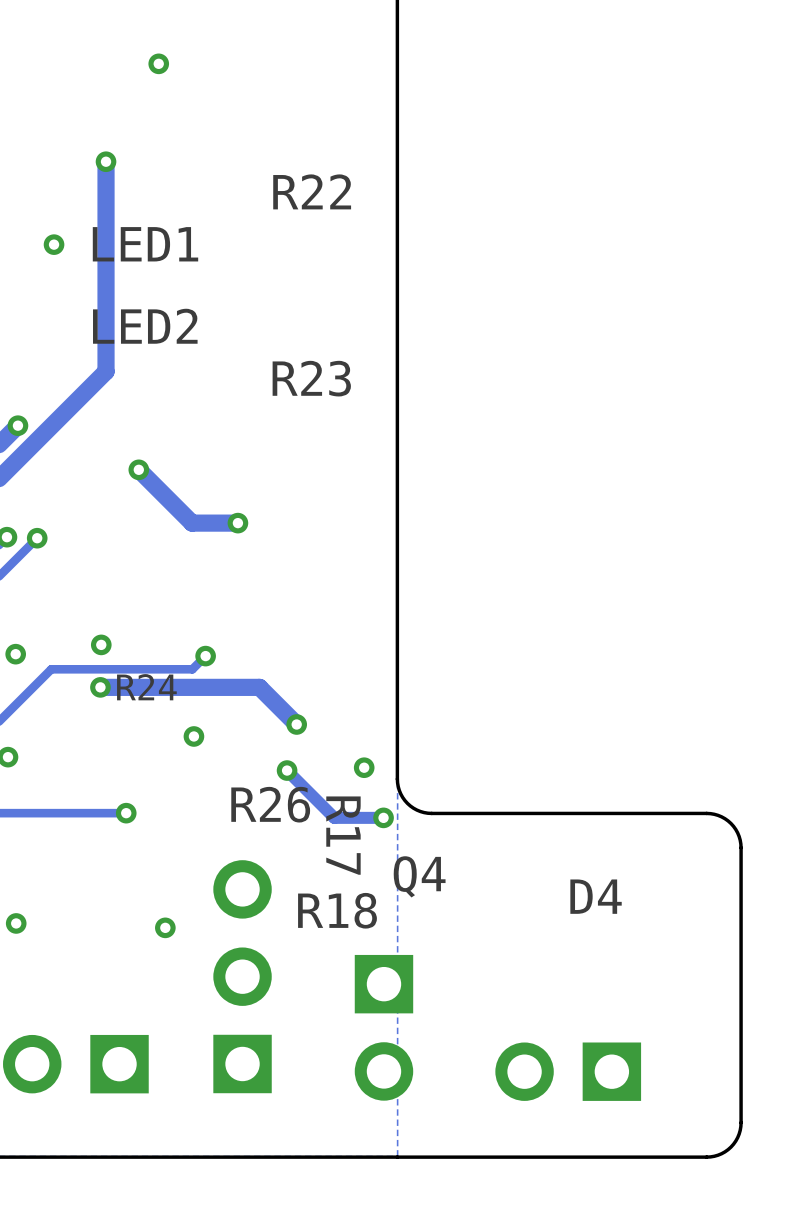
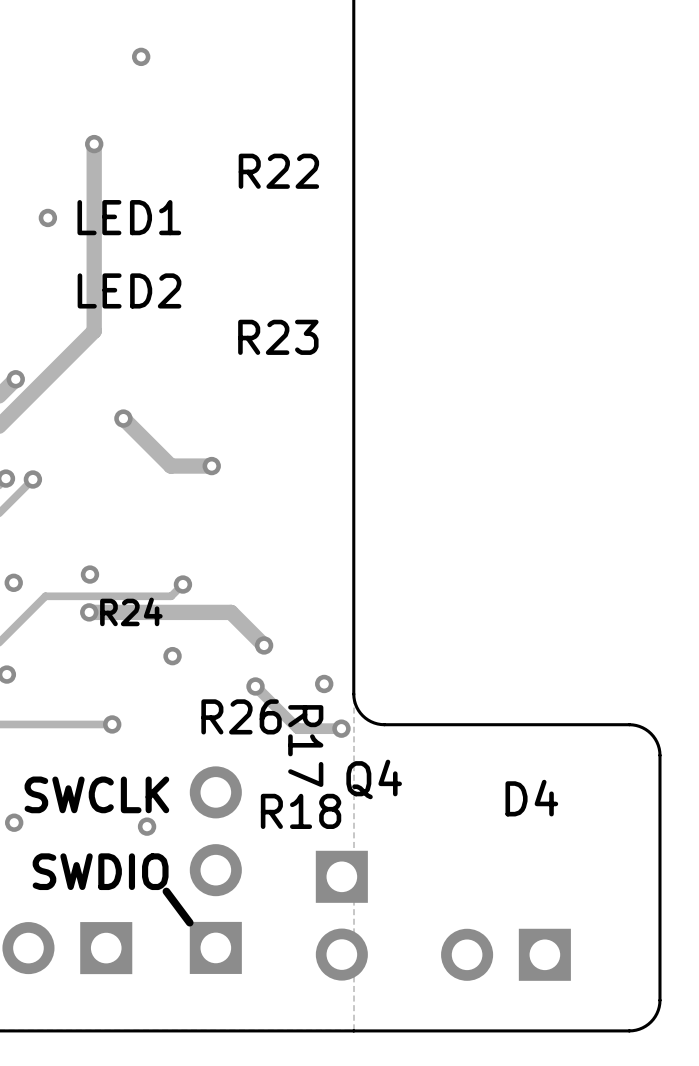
text: none -> SWCLK (96, 794)
text: none -> SWDIO (100, 871)
line: none -> (166, 891) (189, 922)

